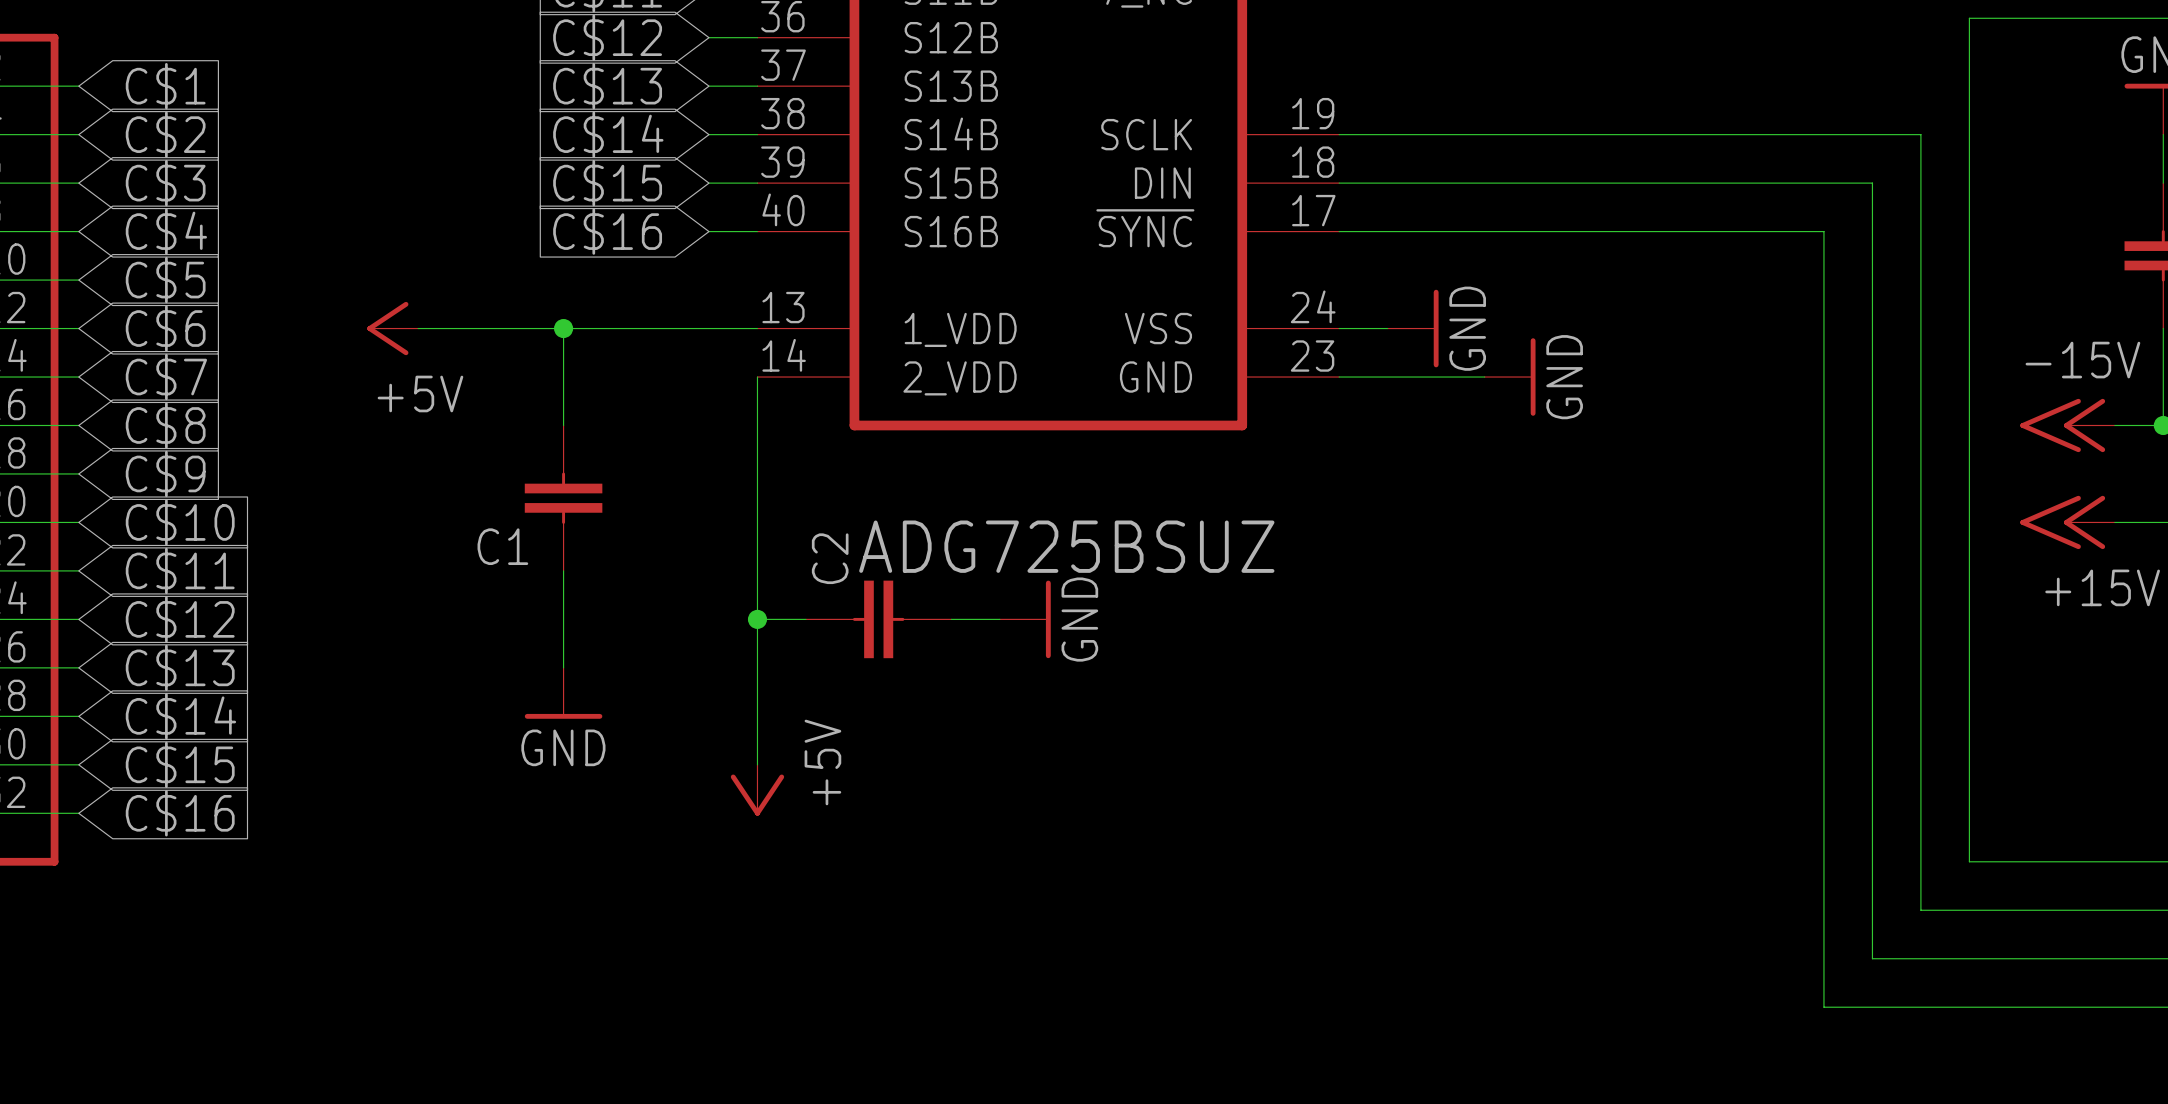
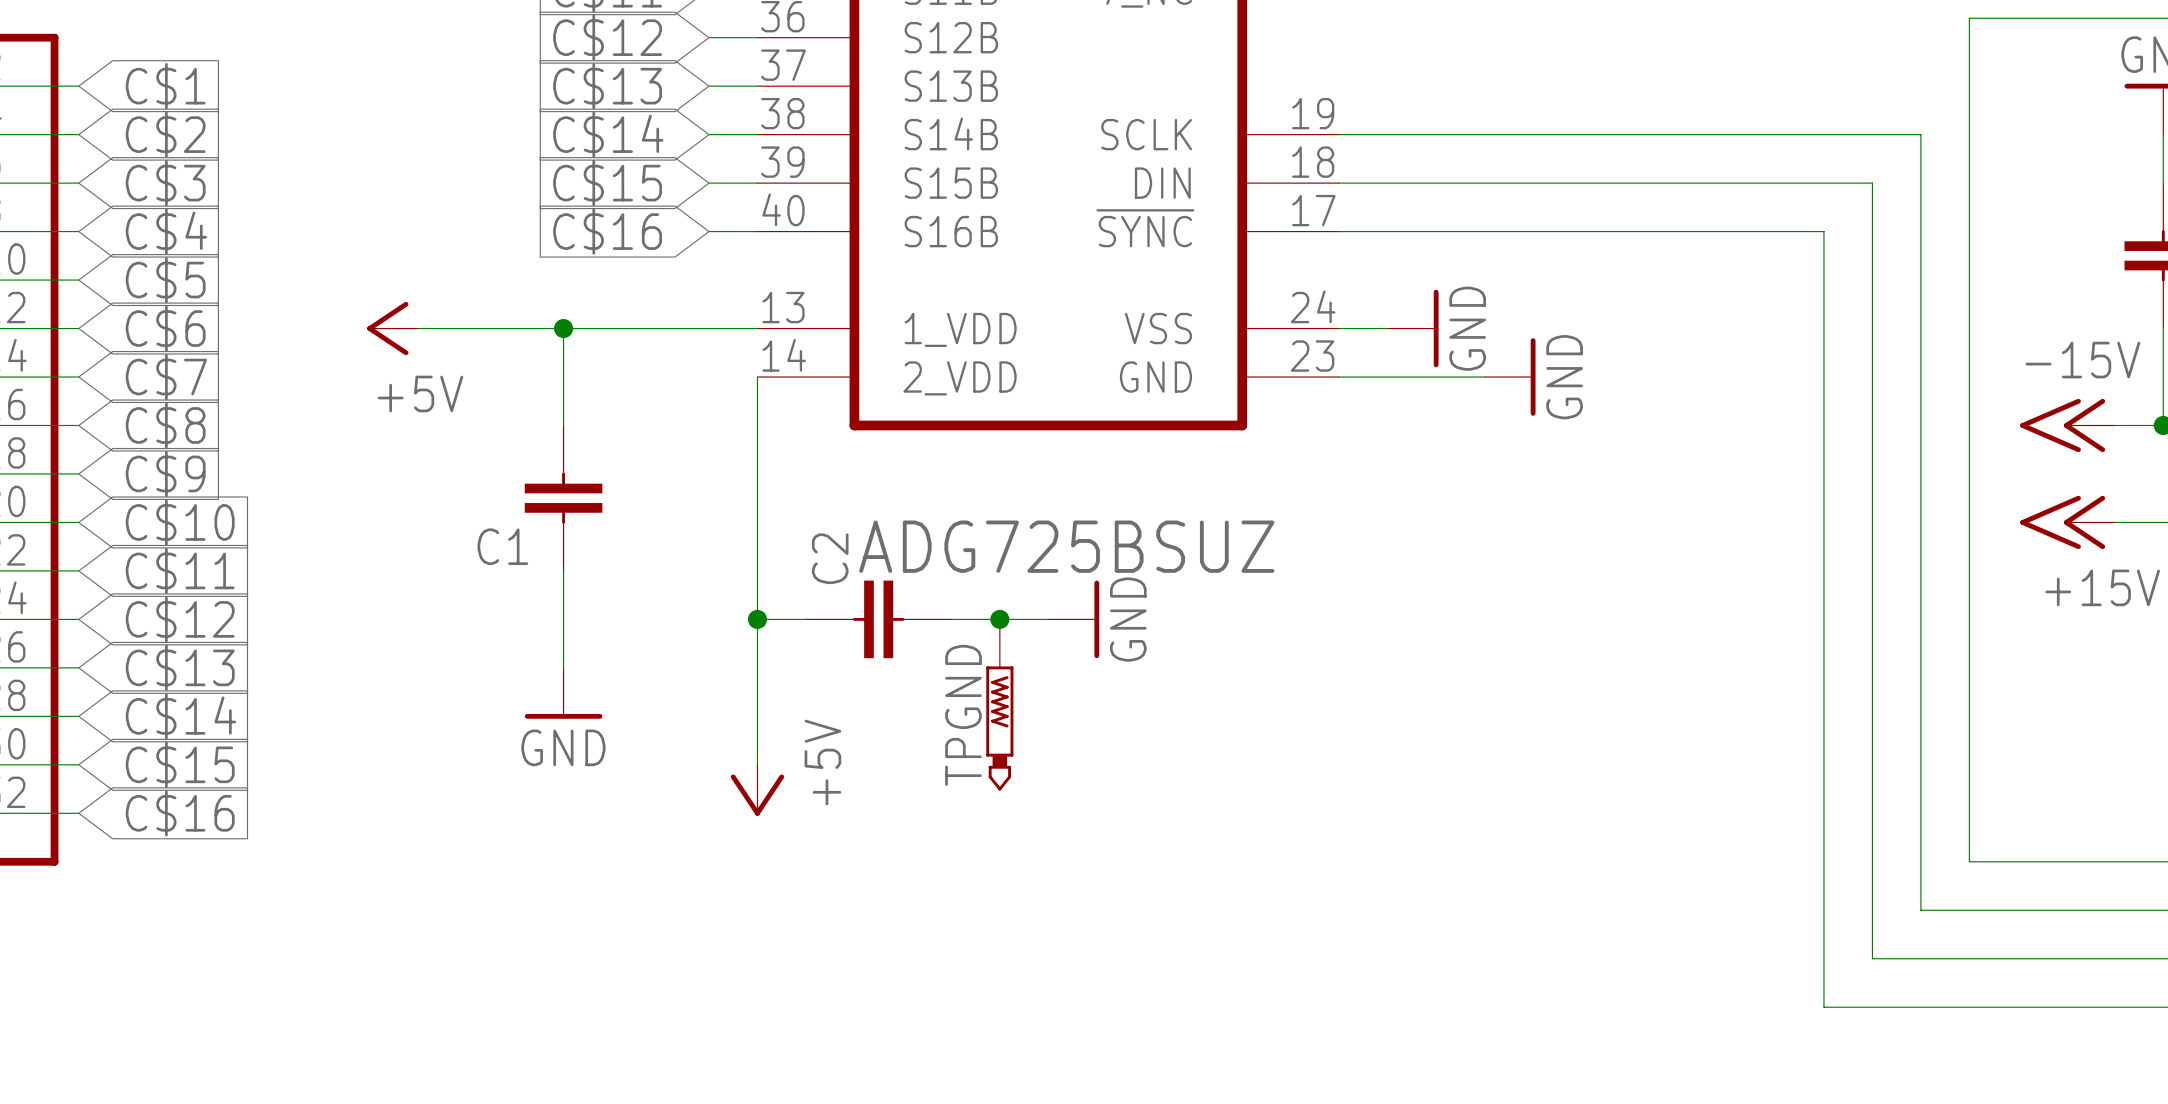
junction: none -> (999, 619)
power symbol position: GND (1025, 619) -> GND (1073, 619)
TPGND: none -> (999, 704)

